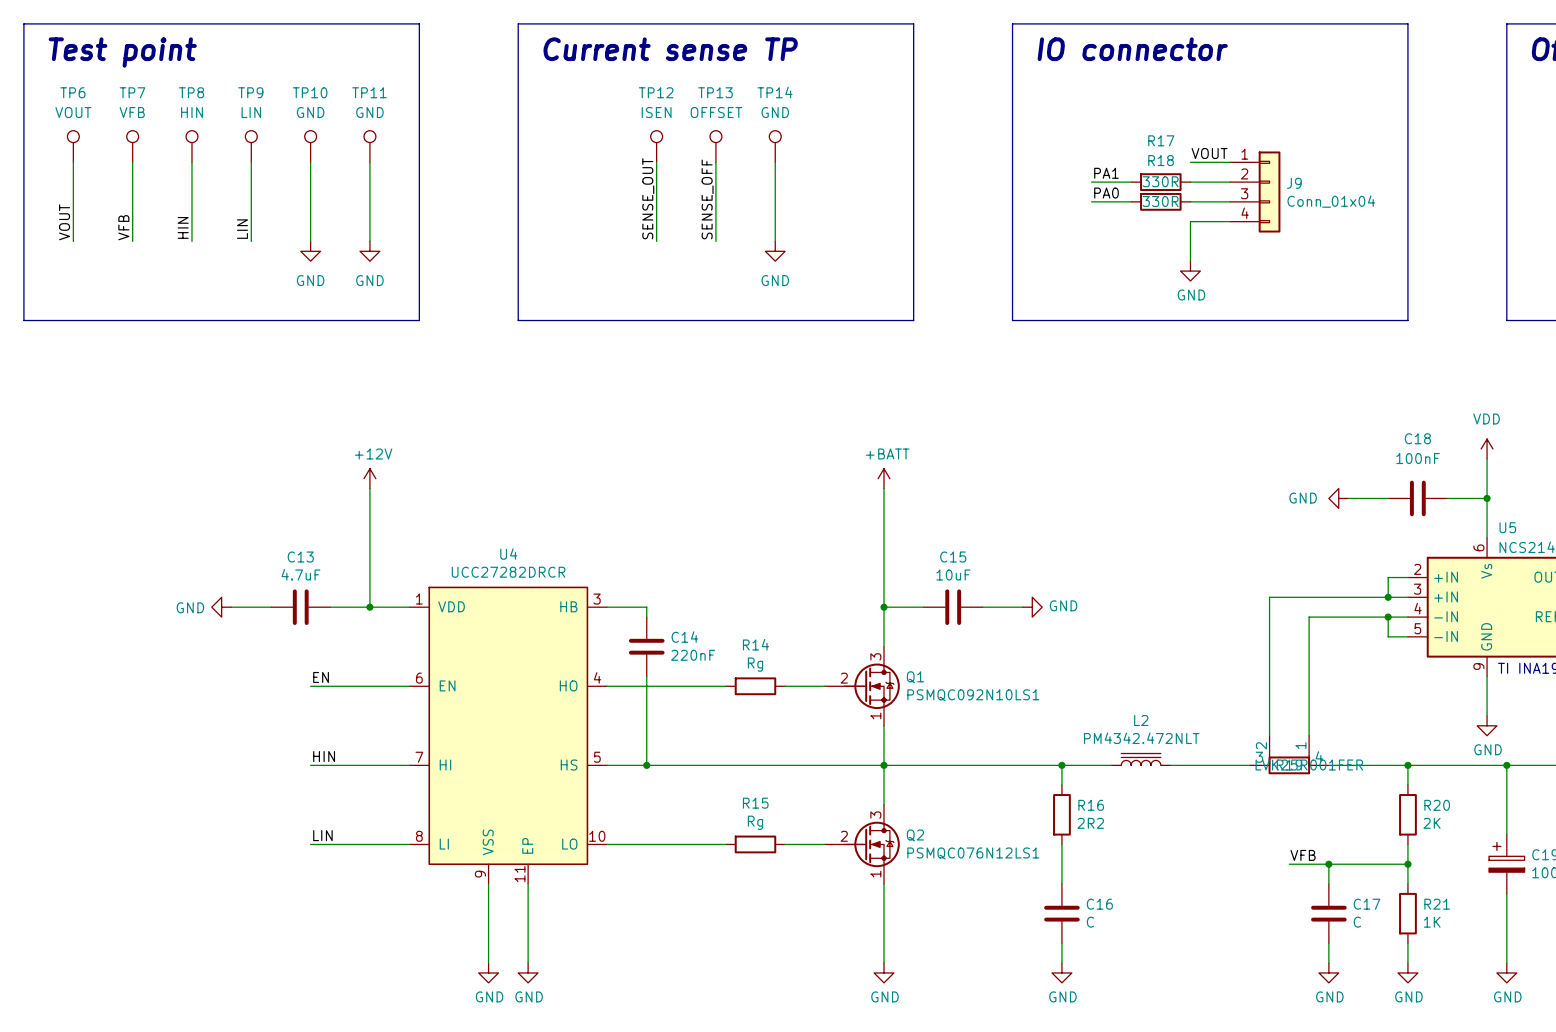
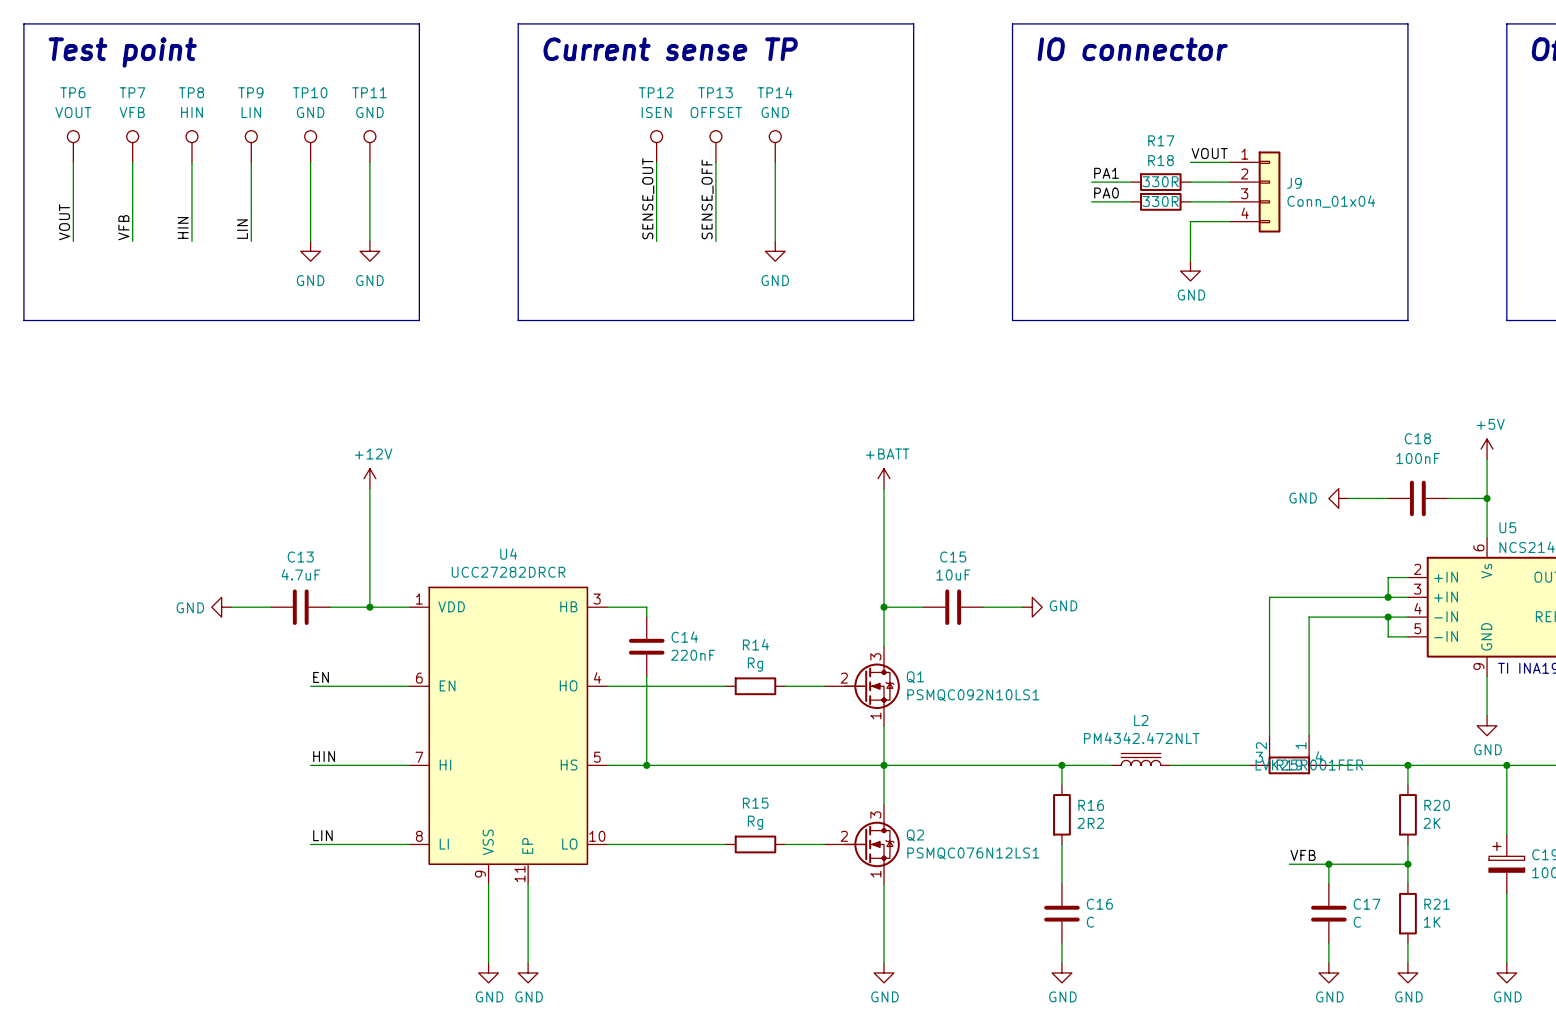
power symbol: VDD (1487, 449) -> +5V (1487, 449)

